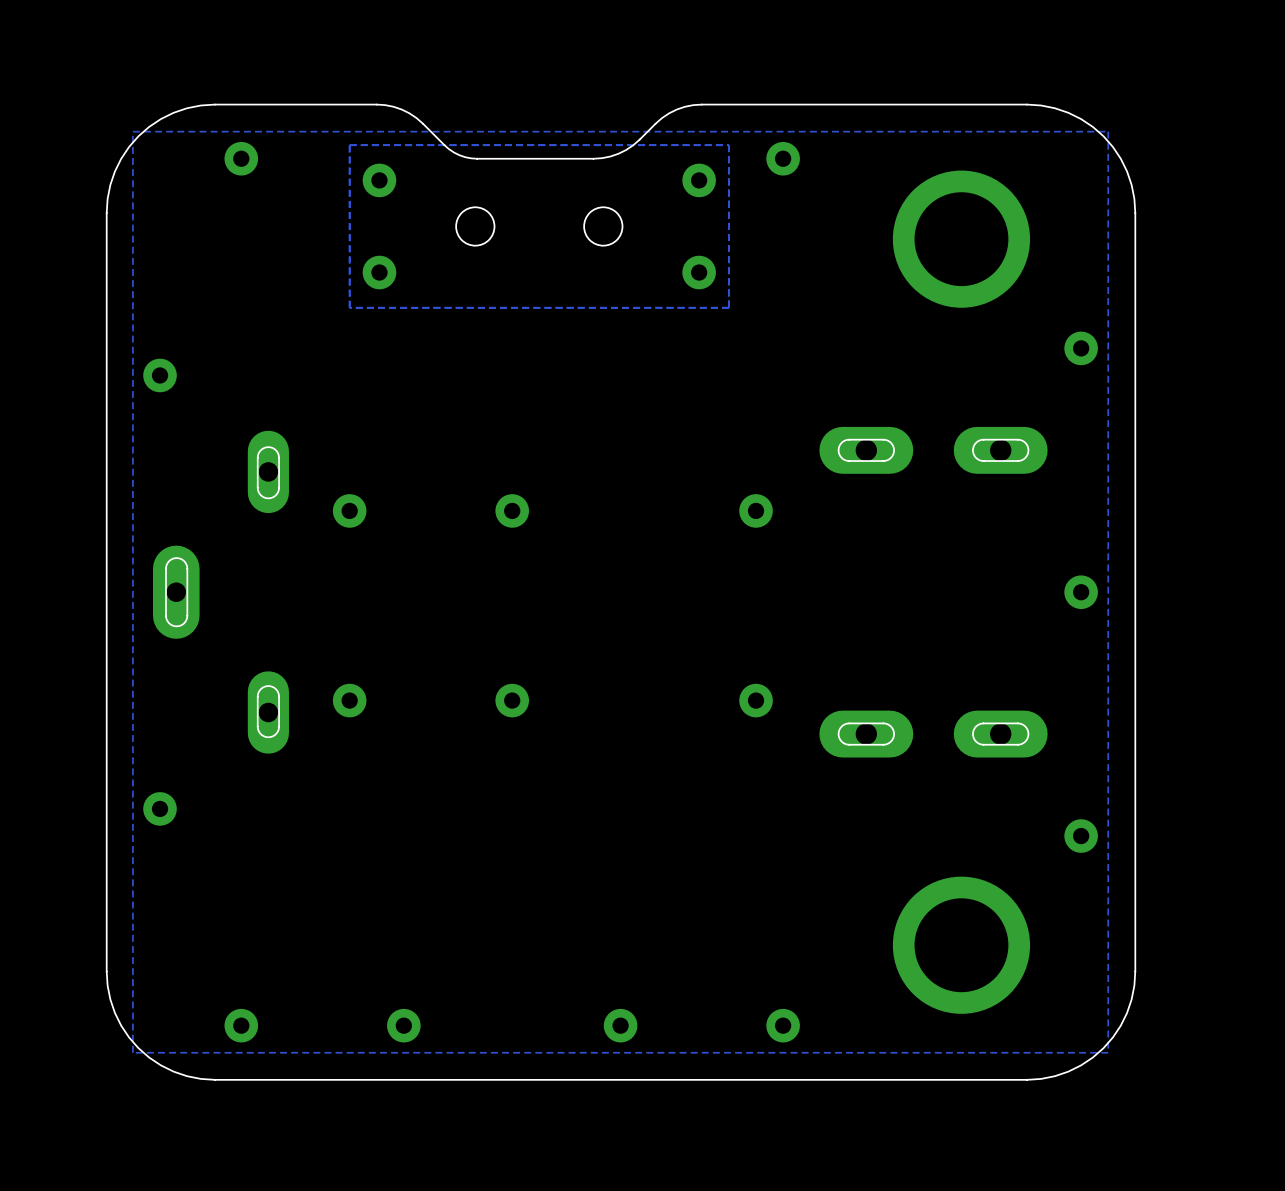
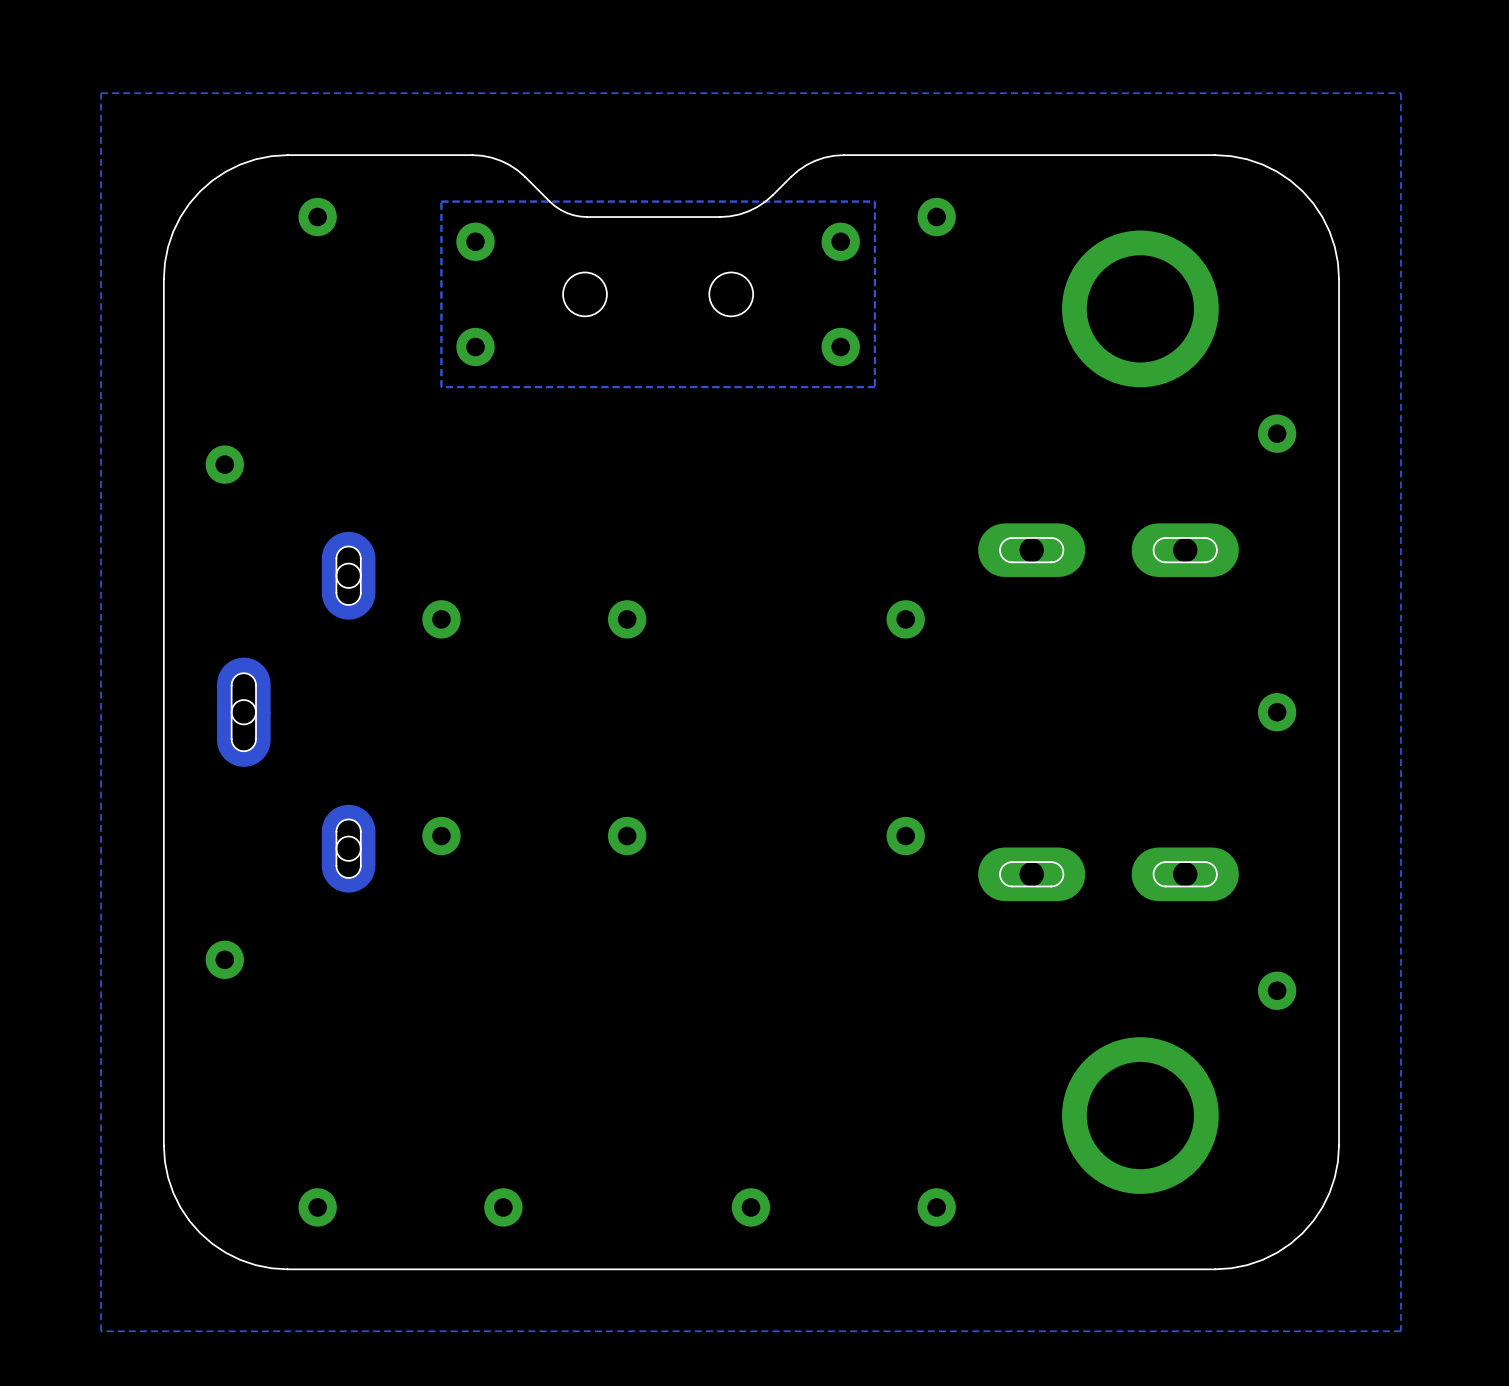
zone outline: (1108, 131) (1108, 1052) (132, 1052) (132, 131) (1108, 131) -> (1400, 93) (1400, 1331) (101, 1331) (101, 93) (1400, 93)
part footprint: [152, 430, 289, 754] -> [217, 531, 376, 893]

